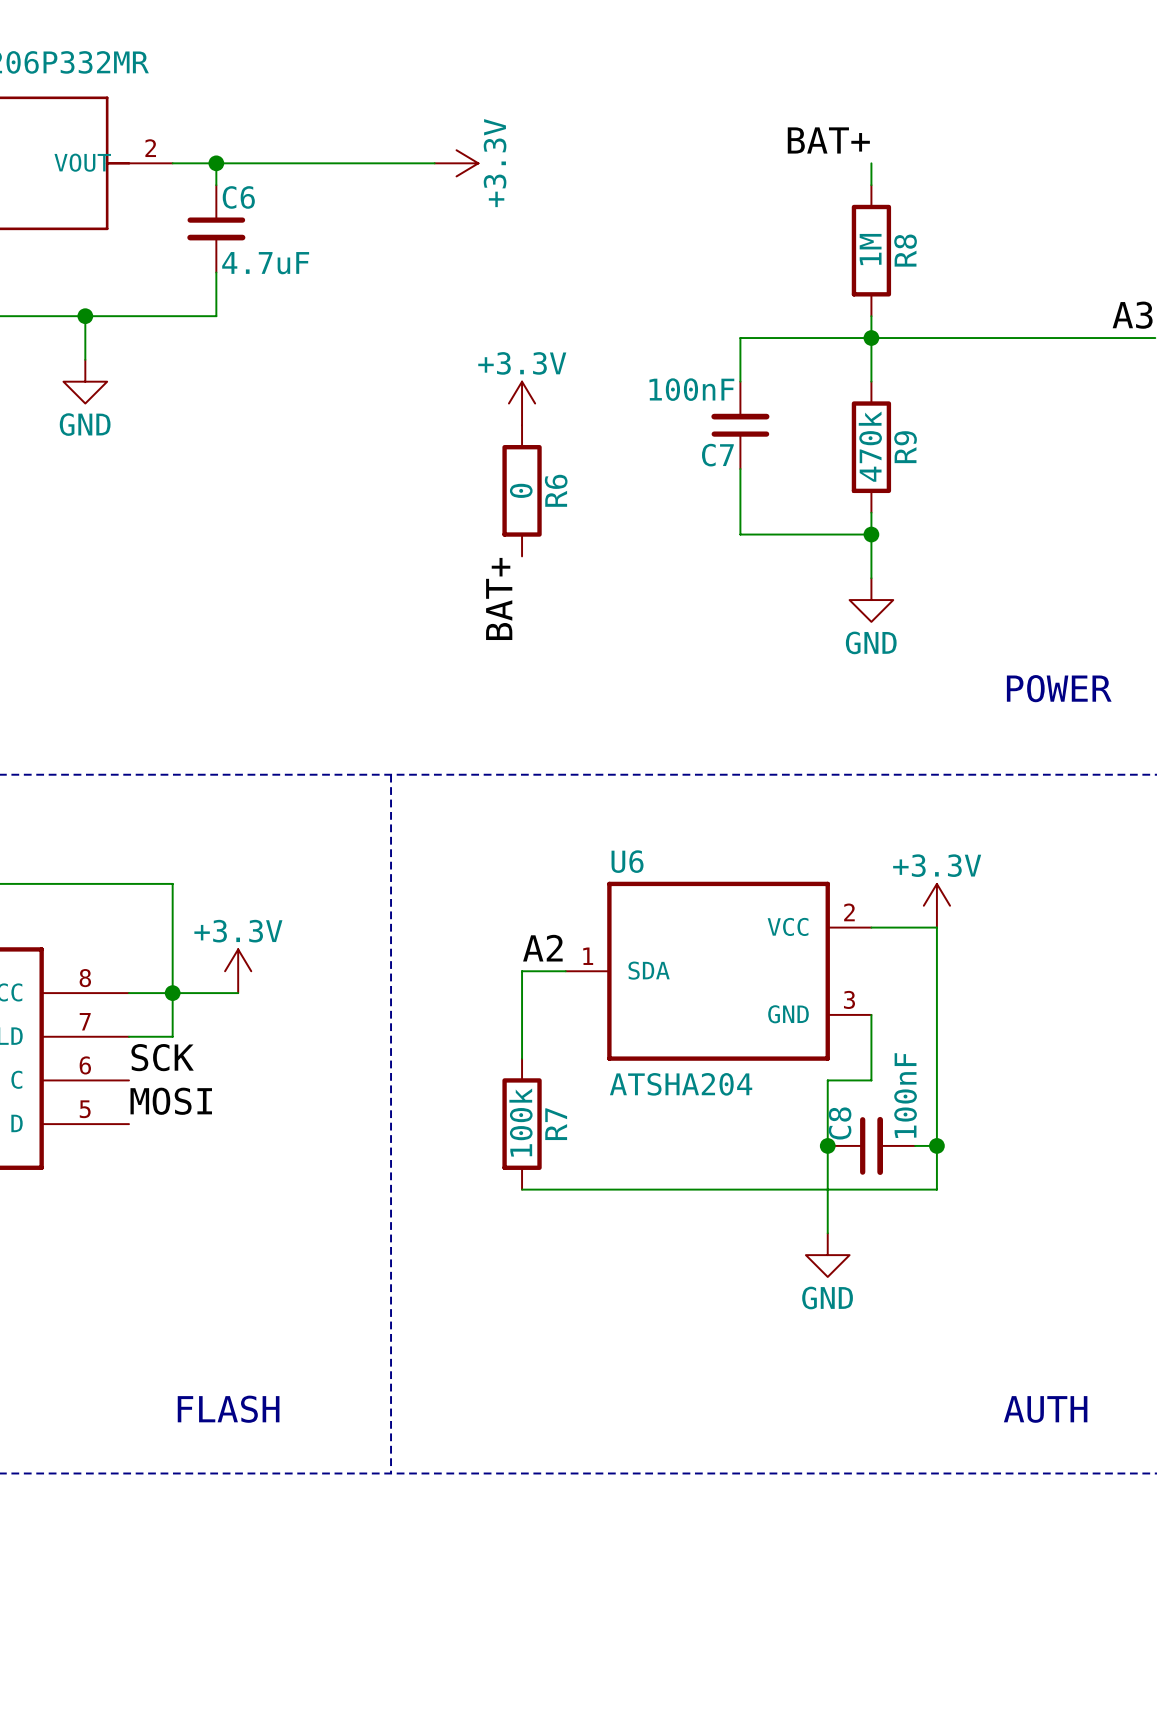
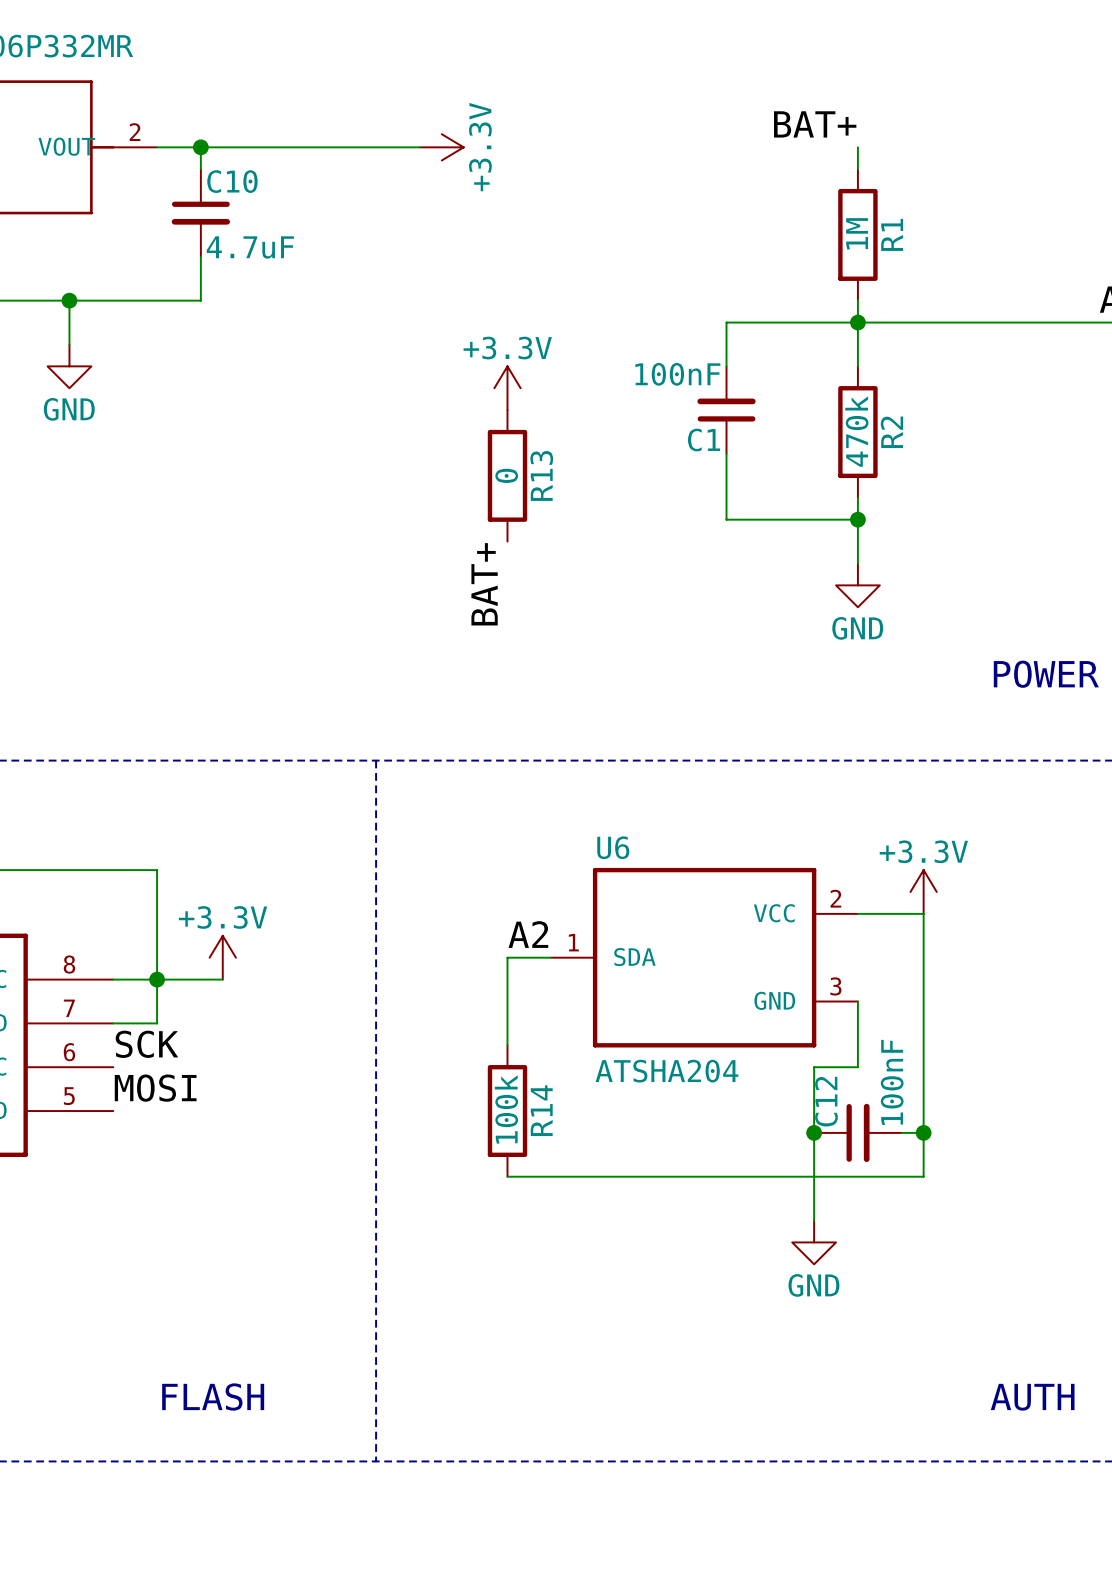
C6 name: C6 (238, 197) -> C10 (232, 181)
R8 name: R8 (905, 250) -> R1 (892, 234)
R9 name: R9 (905, 447) -> R2 (891, 432)
C7 name: C7 (717, 455) -> C1 (704, 440)
R6 name: R6 (556, 490) -> R13 (541, 475)
C8 name: C8 (840, 1123) -> C12 (826, 1101)
R7 name: R7 (556, 1124) -> R14 (541, 1110)

